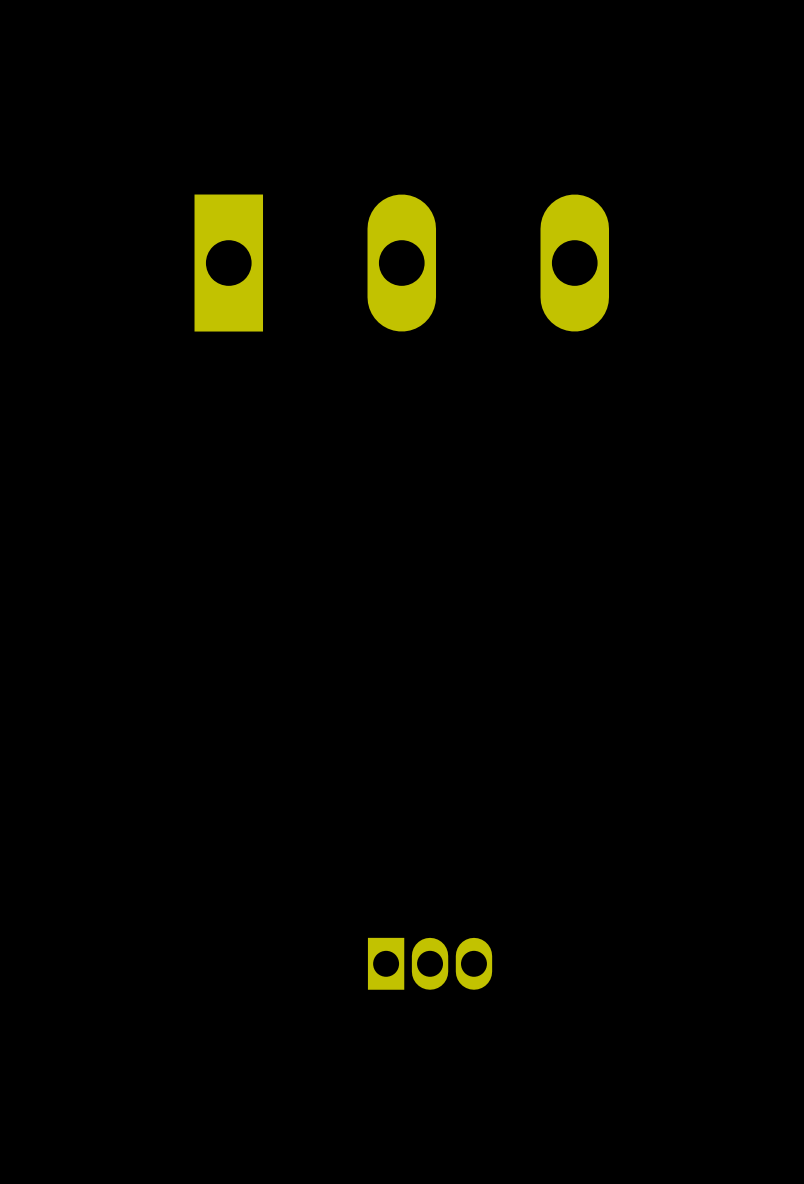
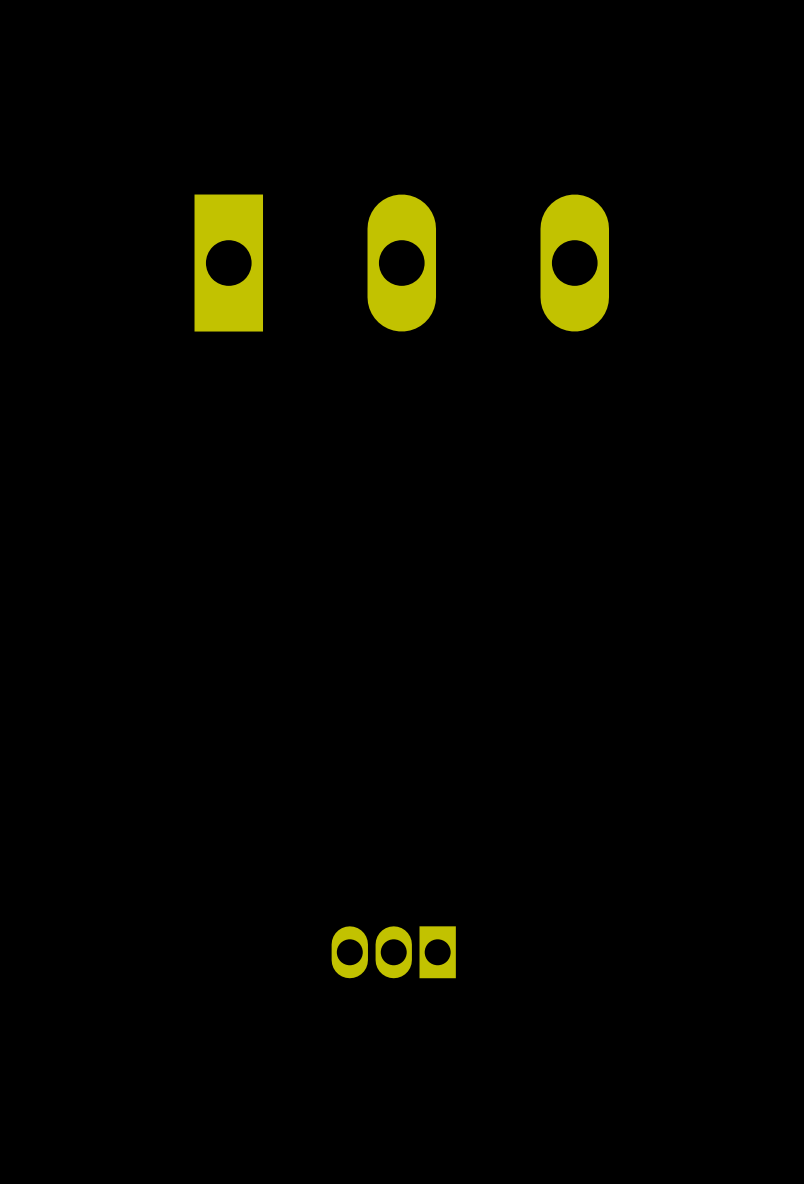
part rotation: 0° (430, 963) -> 180° (393, 952)

